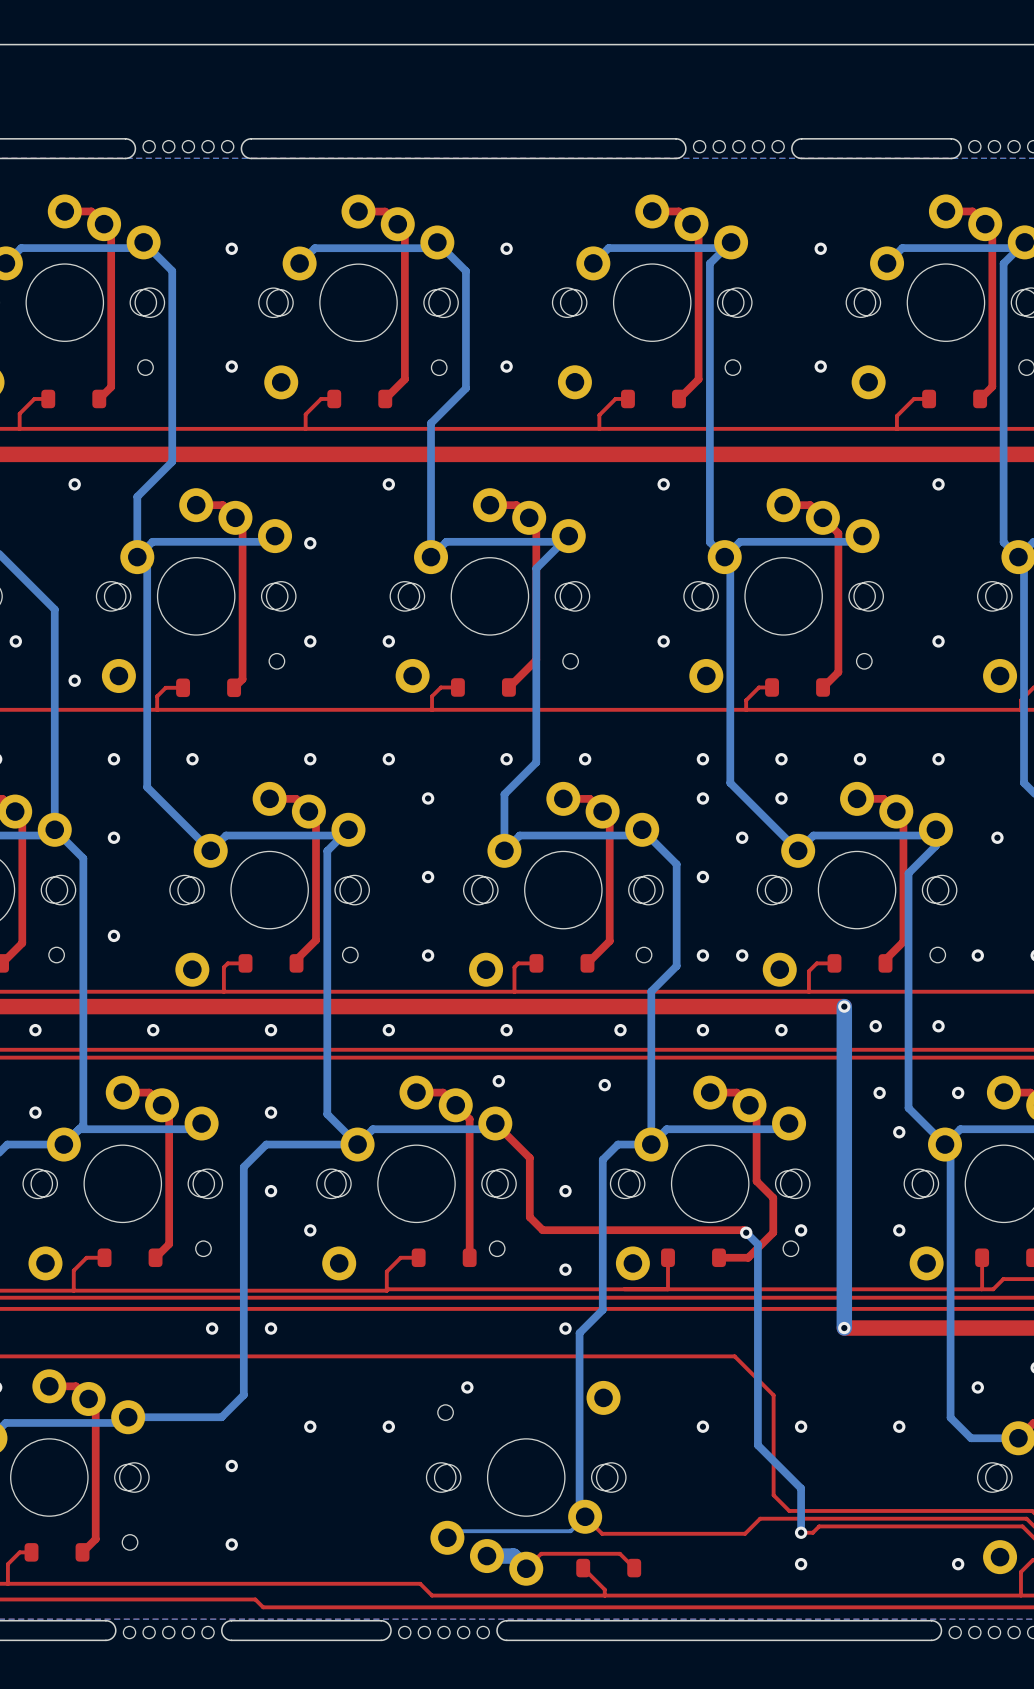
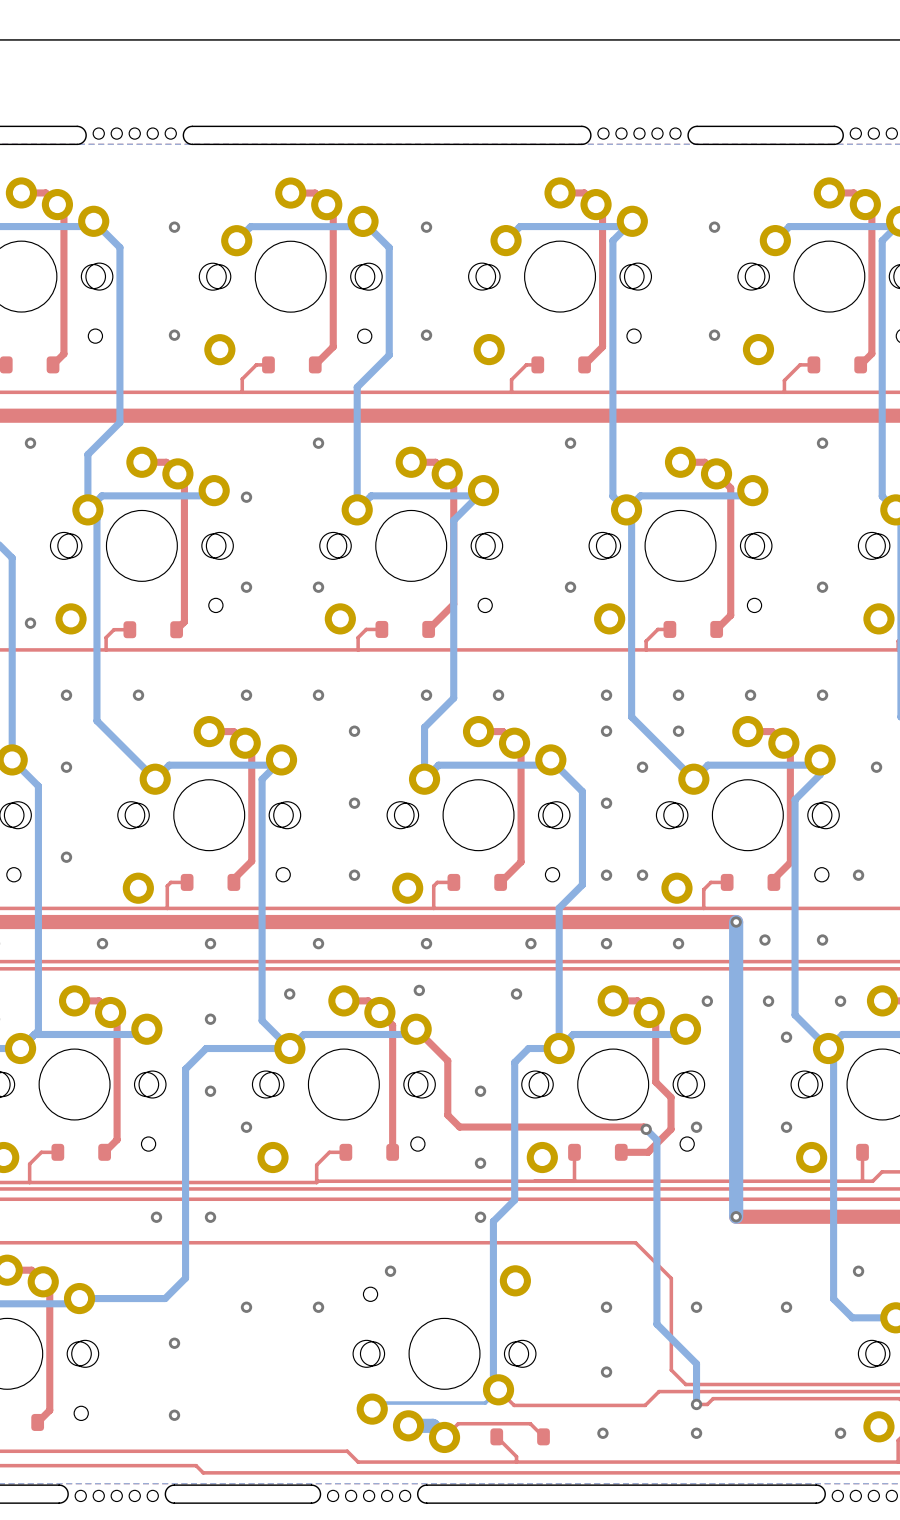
via: none -> (289, 994)
via: none -> (707, 1001)
via: none -> (606, 1372)
via: none -> (602, 1433)

